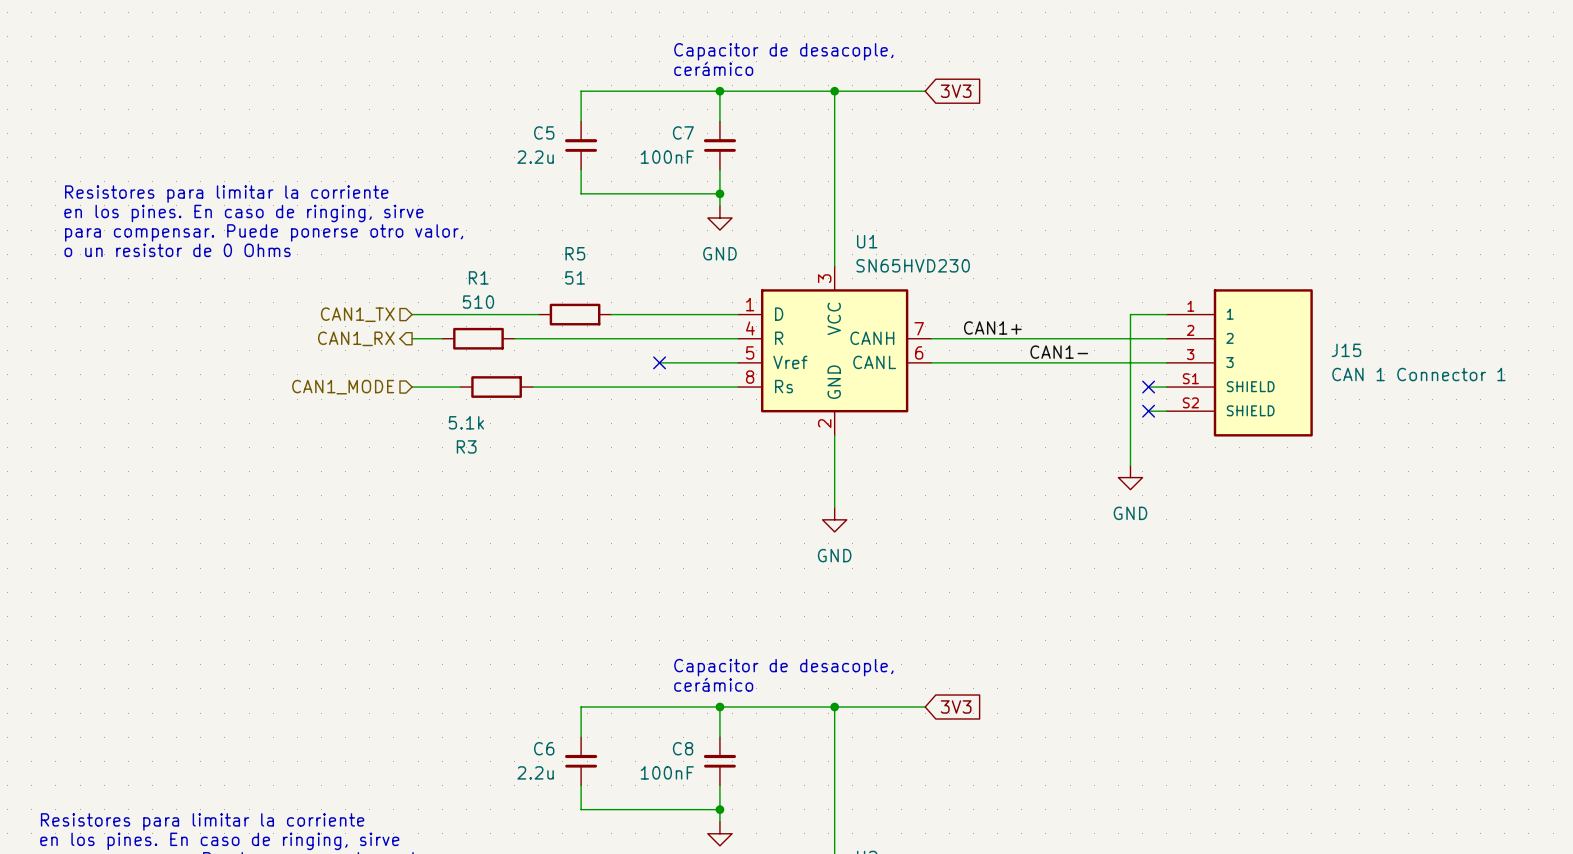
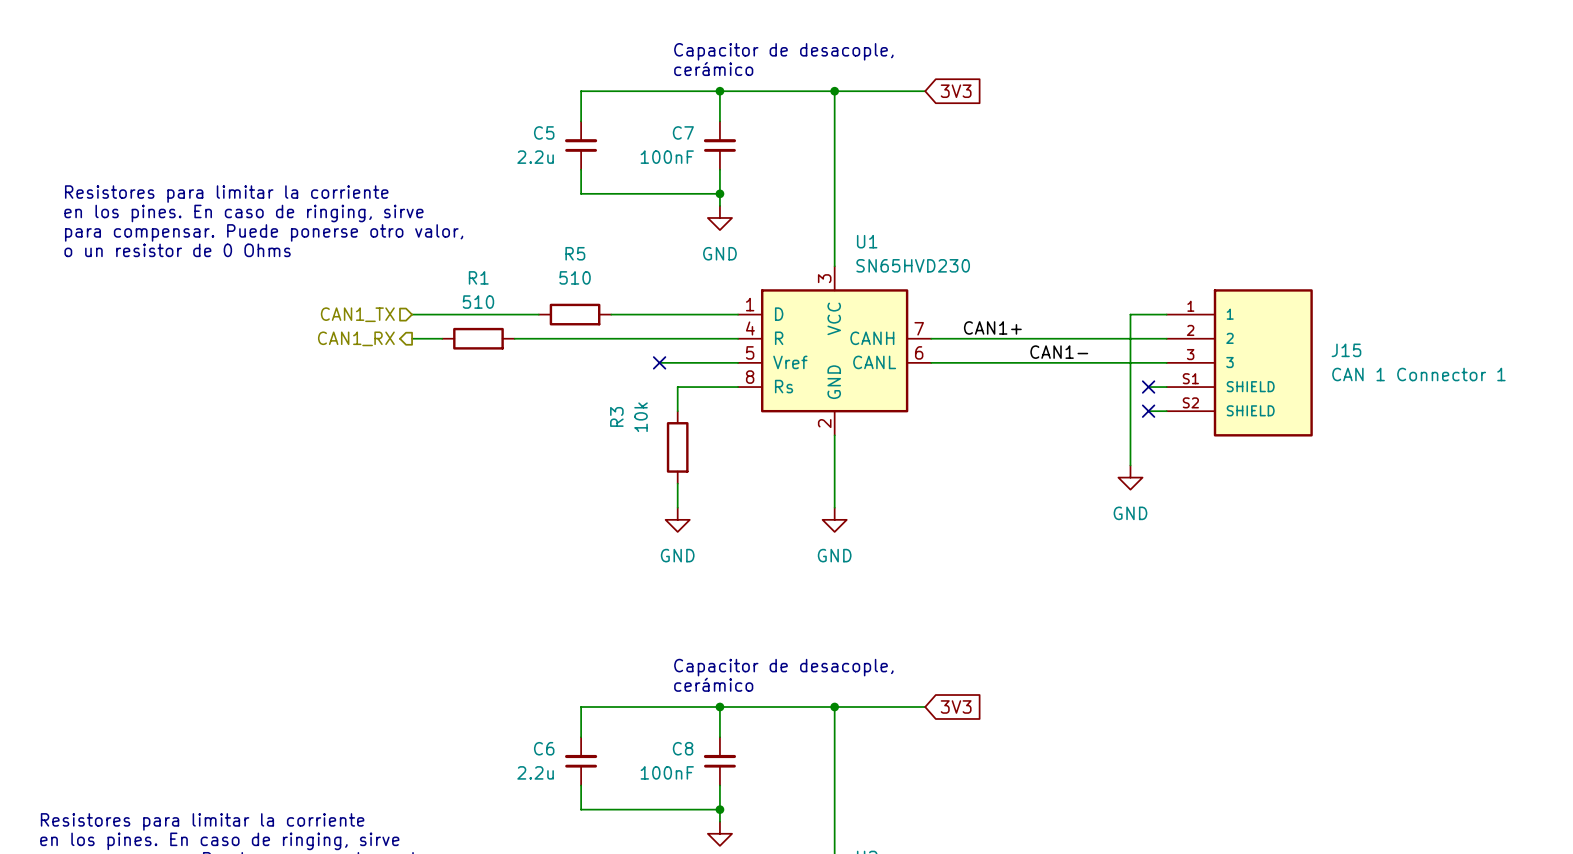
R5 value: 51 (575, 277) -> 510 (575, 277)
hierarchical label: CAN1_MODE (343, 387) -> none
wire: (412, 387) (460, 387) -> none
R3 rotation: 0° (496, 387) -> 90° clockwise (677, 447)
R3 position: (496, 387) -> (677, 447)
wire: (532, 387) (677, 387) -> (677, 411) (677, 387)
R3 value: 5.1k (466, 422) -> 10k (641, 417)
wire: none -> (677, 483) (677, 507)
power symbol: none -> GND (677, 519)

